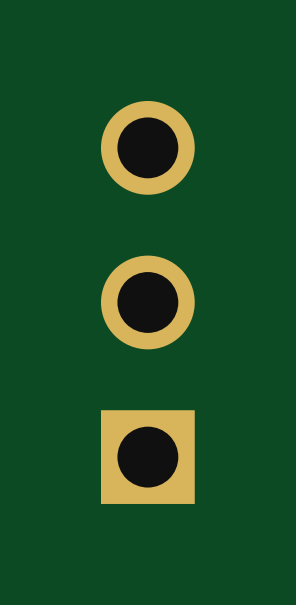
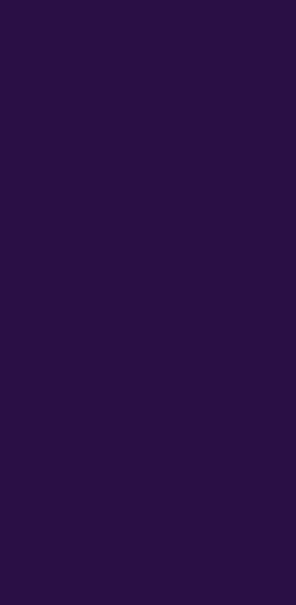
part: (147, 302) -> none

